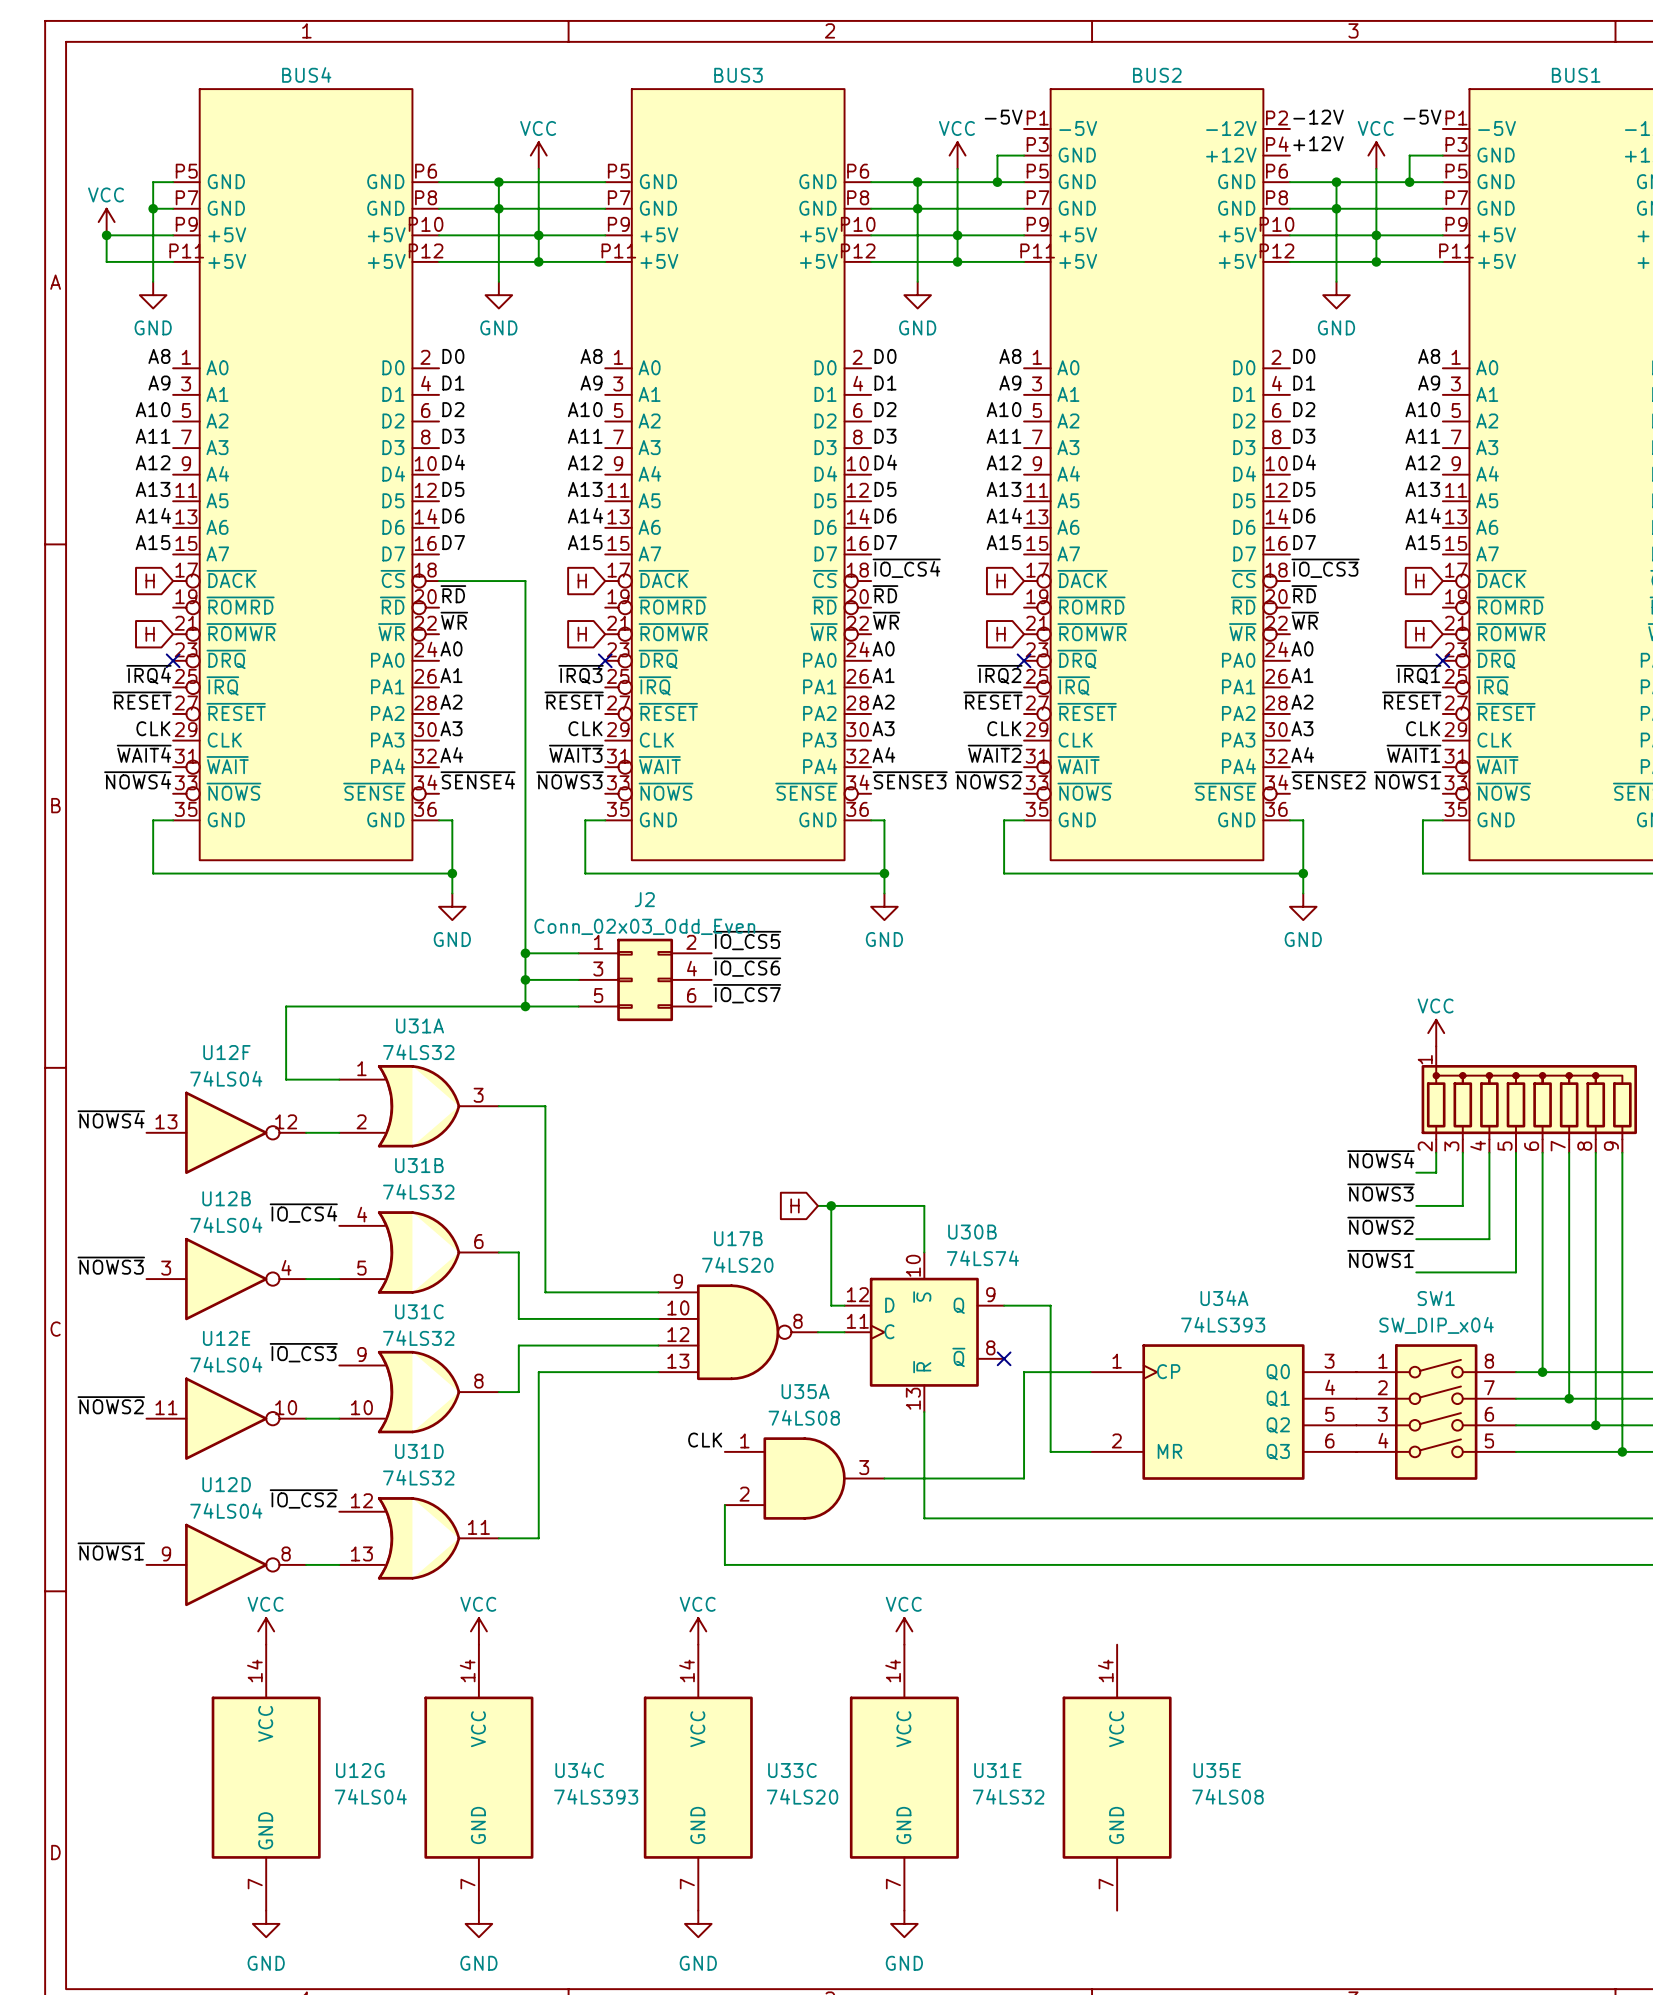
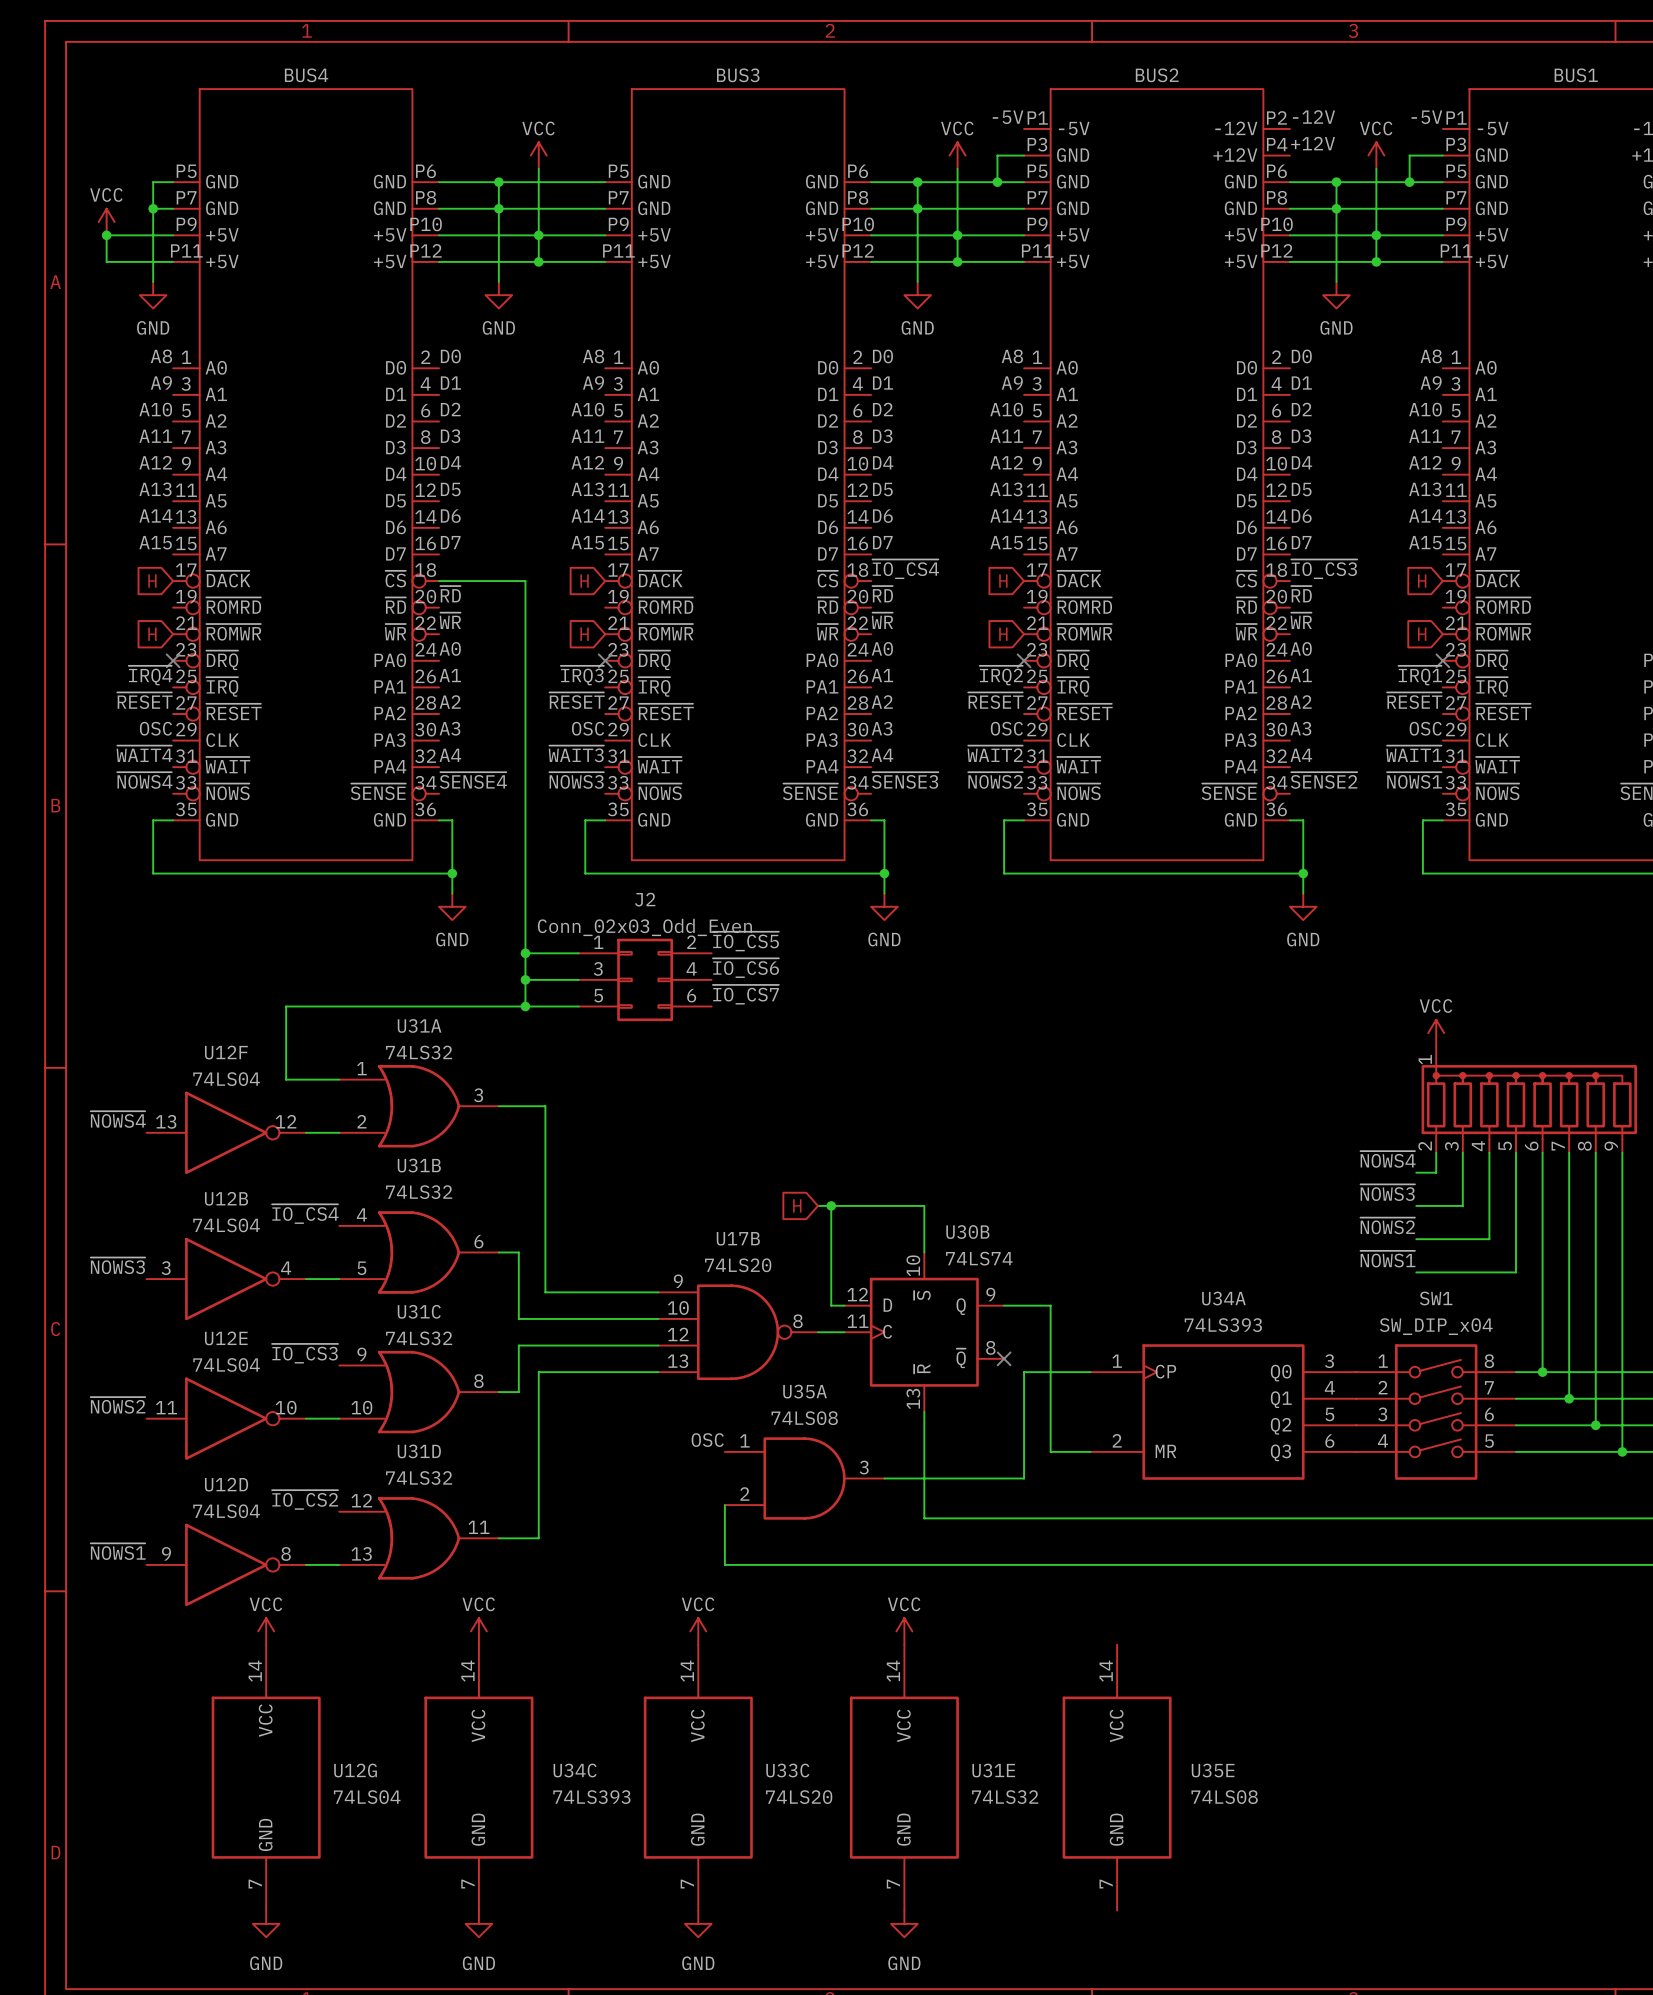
label: CLK (153, 728) -> OSC (155, 728)
label: CLK (585, 728) -> OSC (588, 728)
label: CLK (1004, 728) -> OSC (1006, 728)
label: CLK (1423, 728) -> OSC (1425, 728)
label: CLK (705, 1440) -> OSC (707, 1440)

